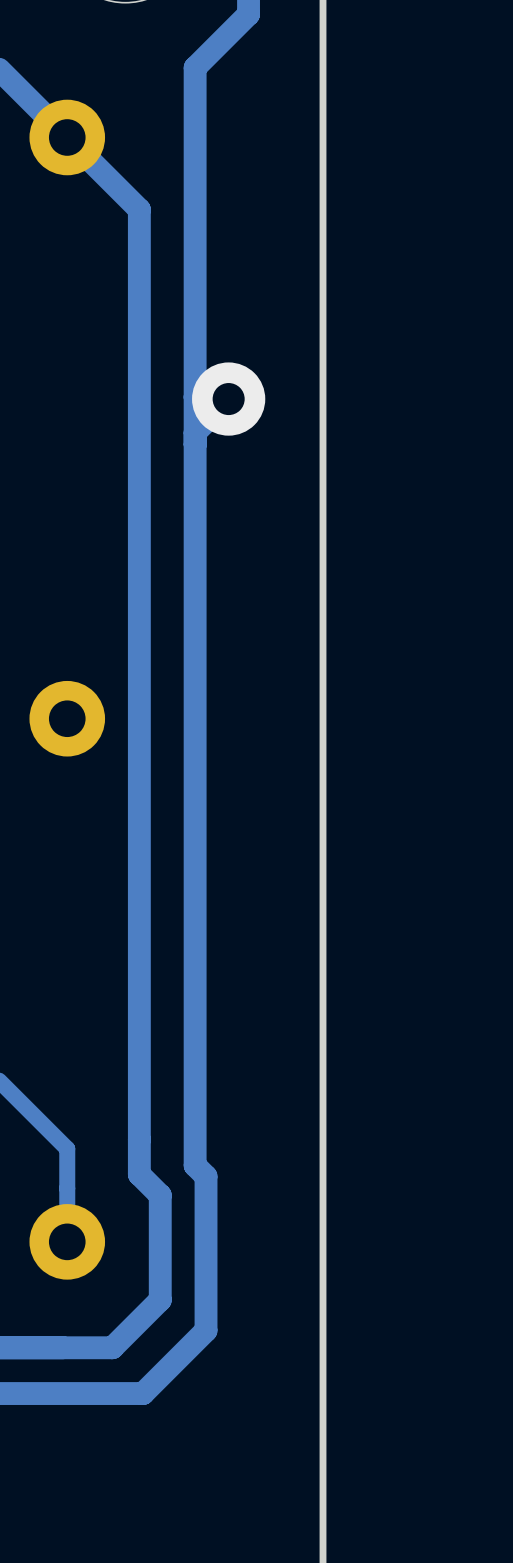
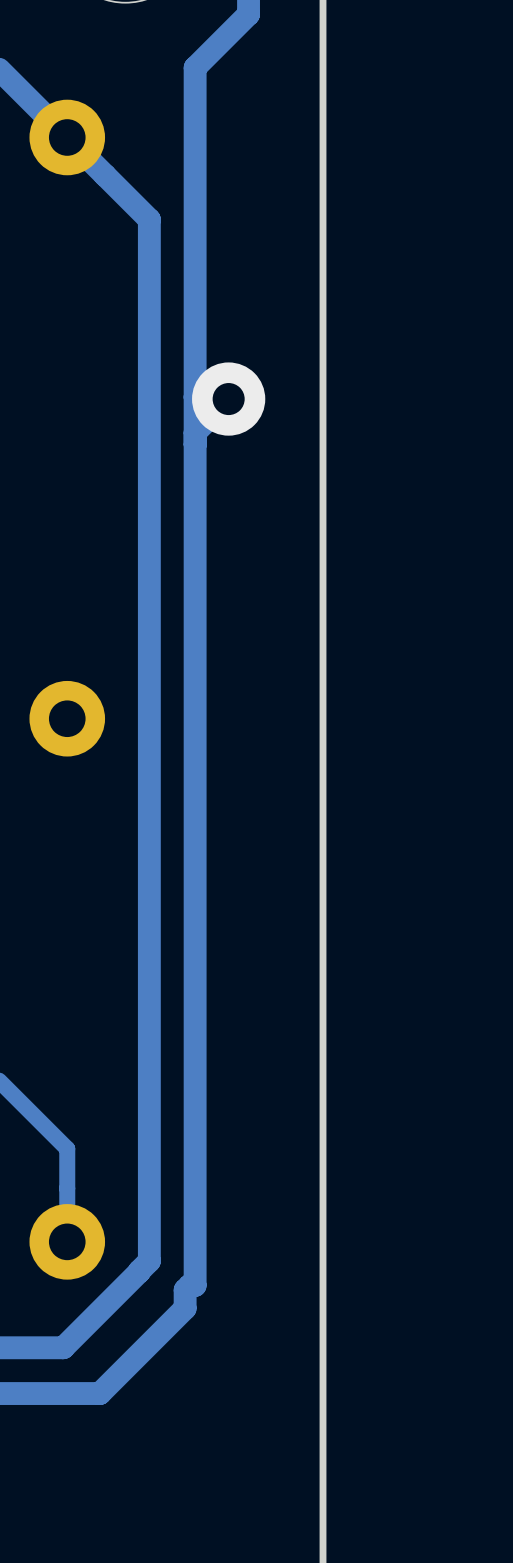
track: (139, 209) (139, 1174) (160, 1195) (160, 1299) (112, 1347) (63, 1347) -> (139, 209) (149, 219) (149, 1261) (139, 1271)
track: (195, 1165) (206, 1176) (206, 1330) (143, 1393) (99, 1393) -> (195, 1165) (195, 1285) (189, 1285) (185, 1290) (185, 1308) (99, 1393)
track: none -> (139, 1271) (63, 1347)

